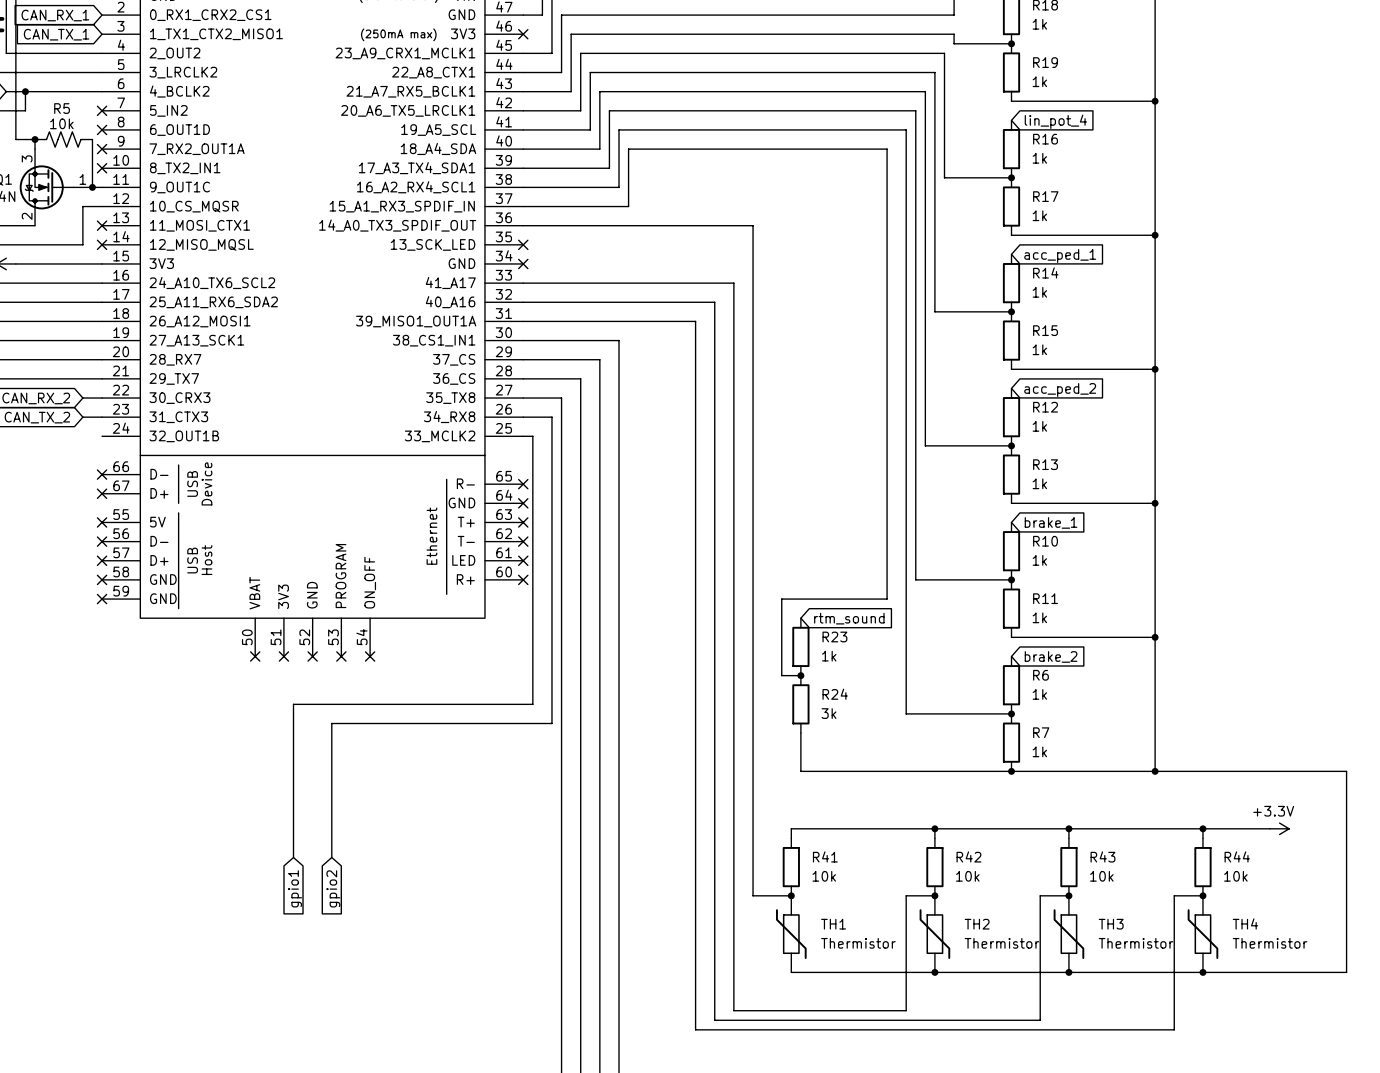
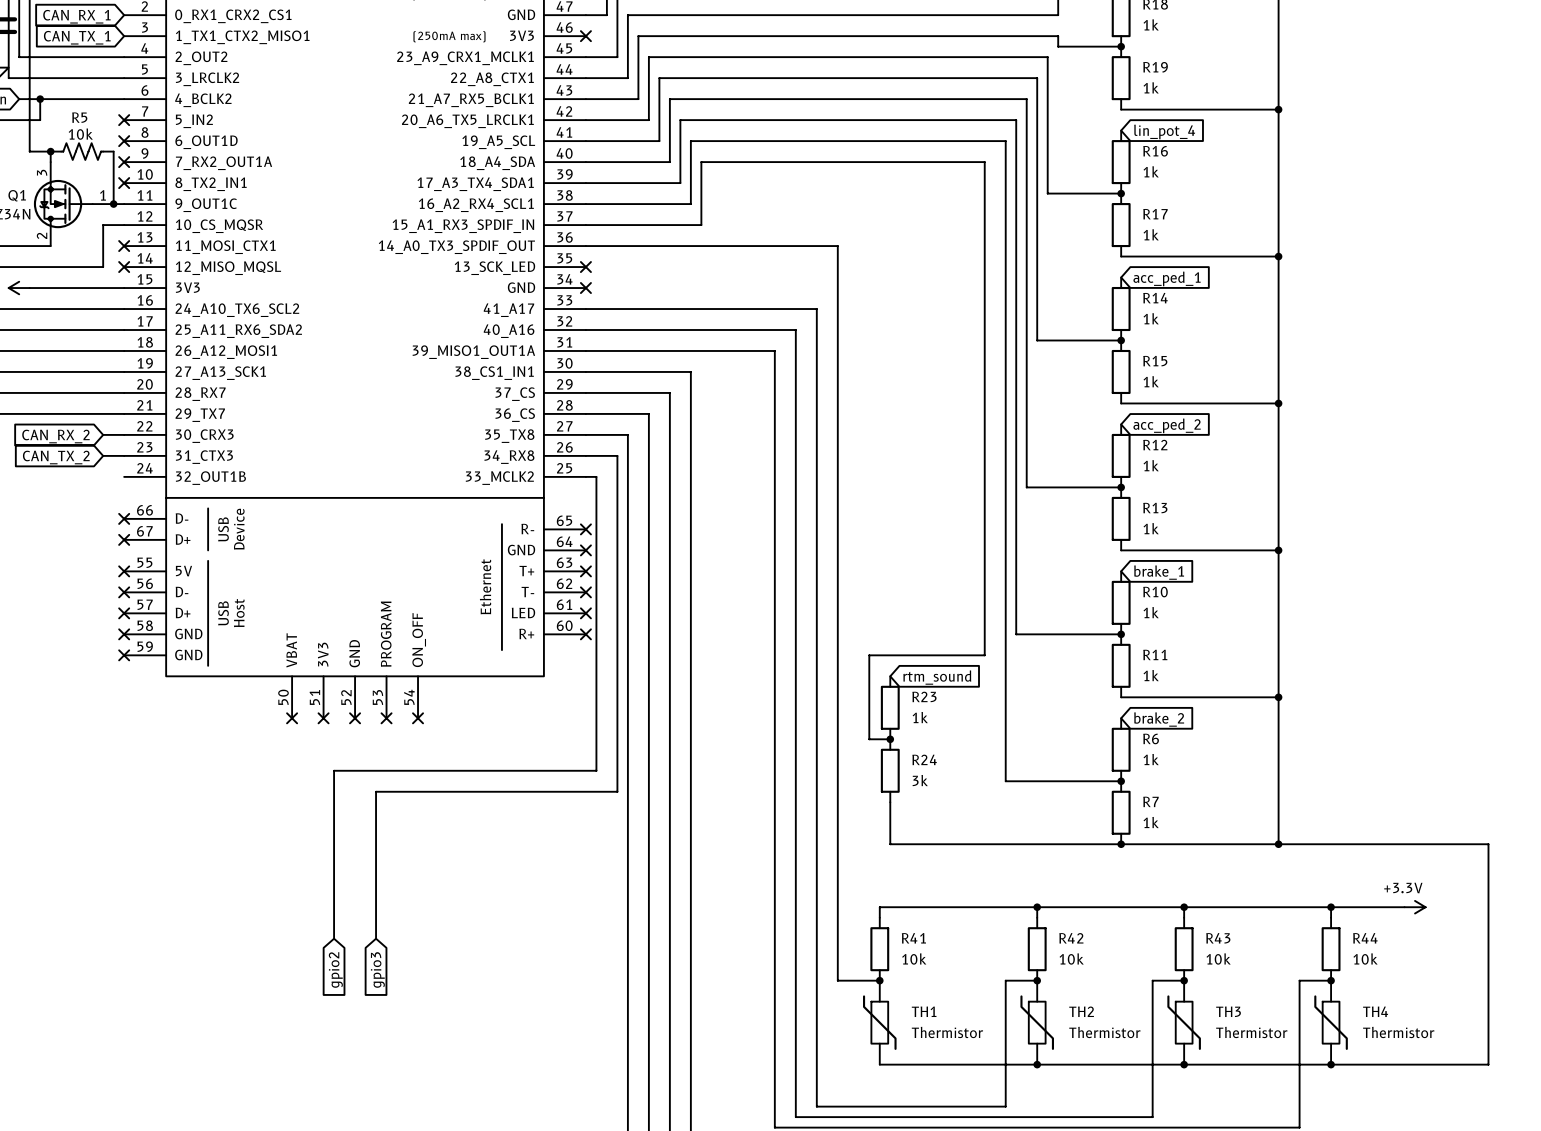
global label: gpio1 (295, 888) -> gpio2 (335, 969)
global label: gpio2 (333, 888) -> gpio3 (377, 969)

